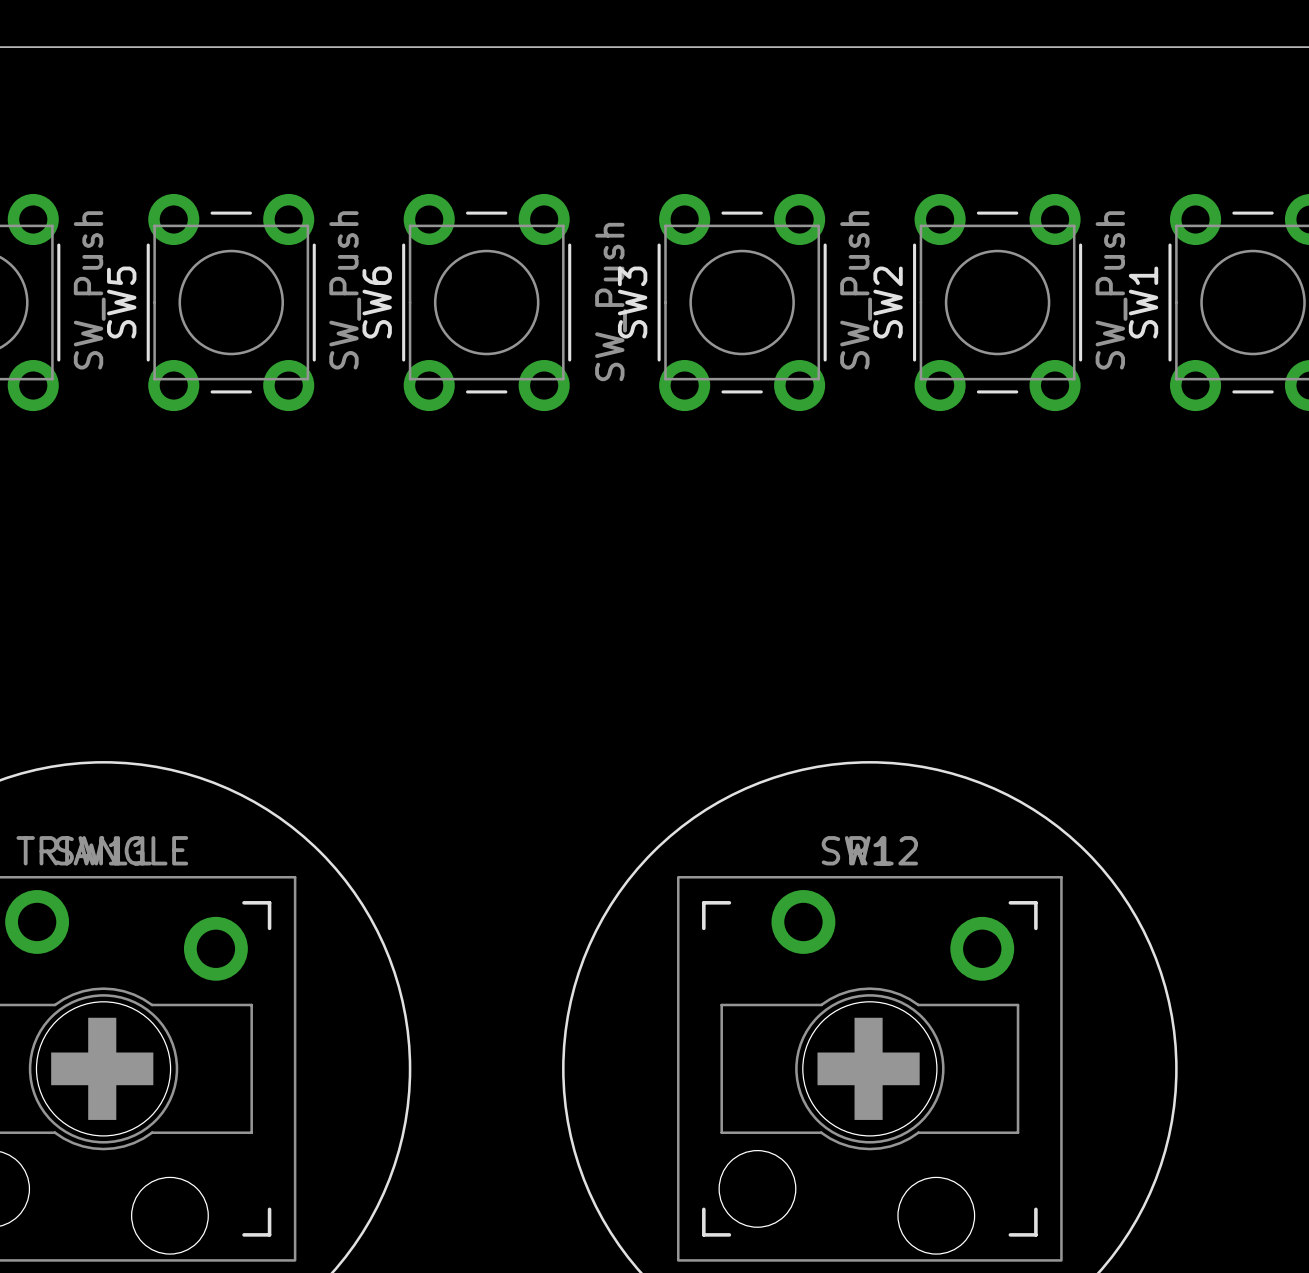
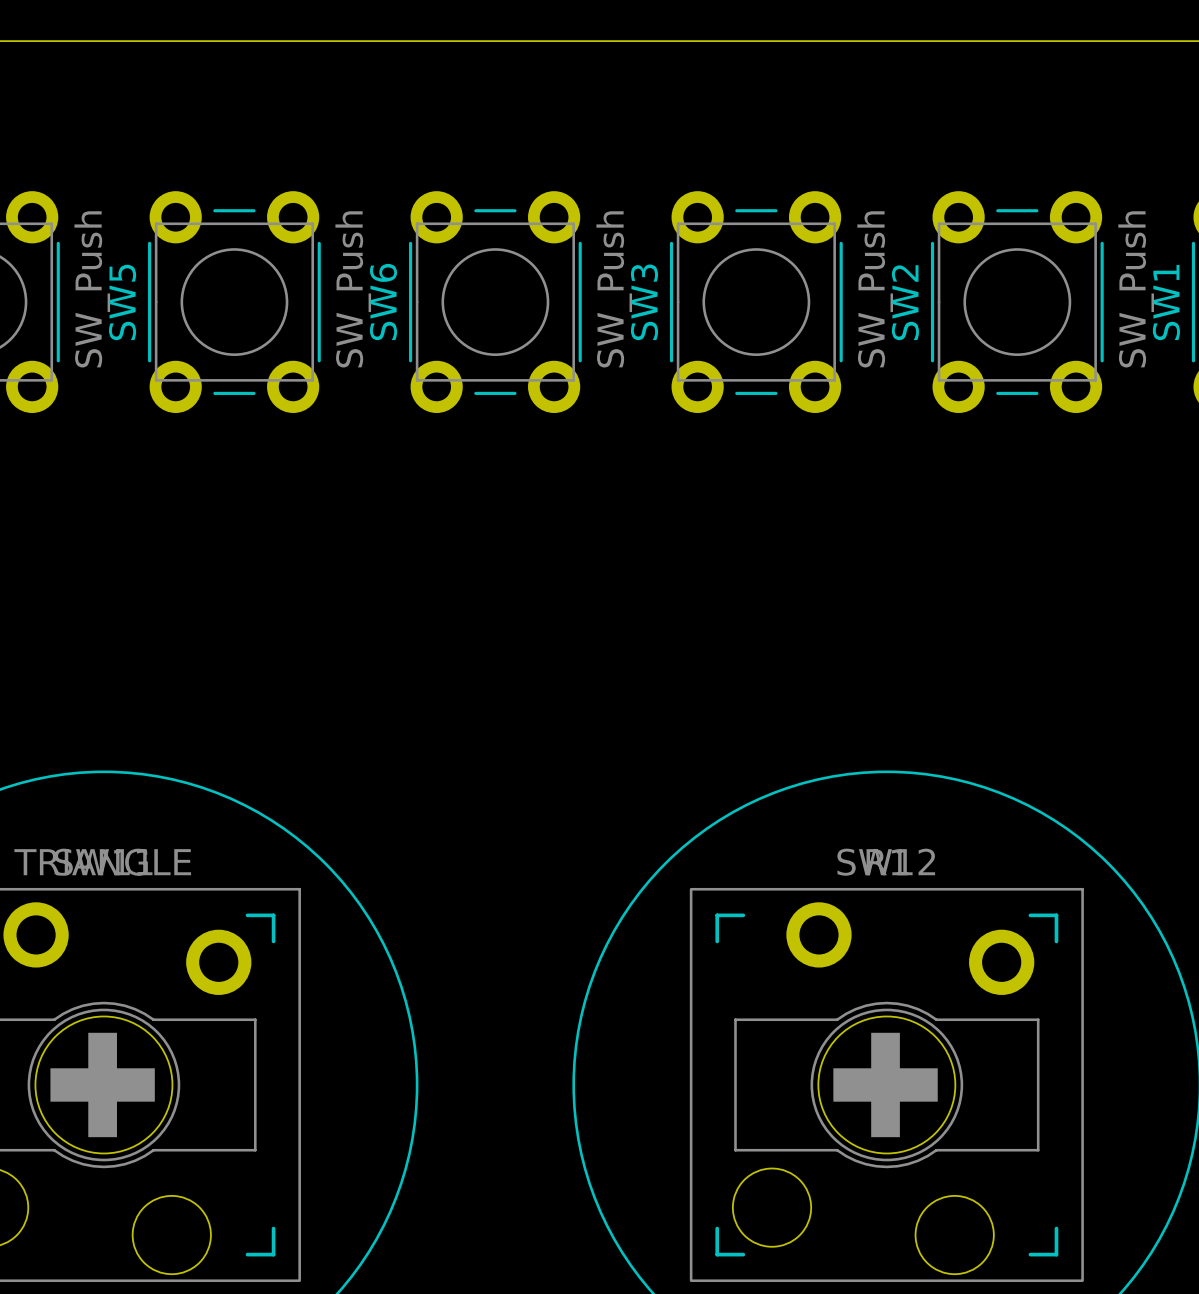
SW6 value position: SW_Push (611, 301) -> SW_Push (614, 289)

